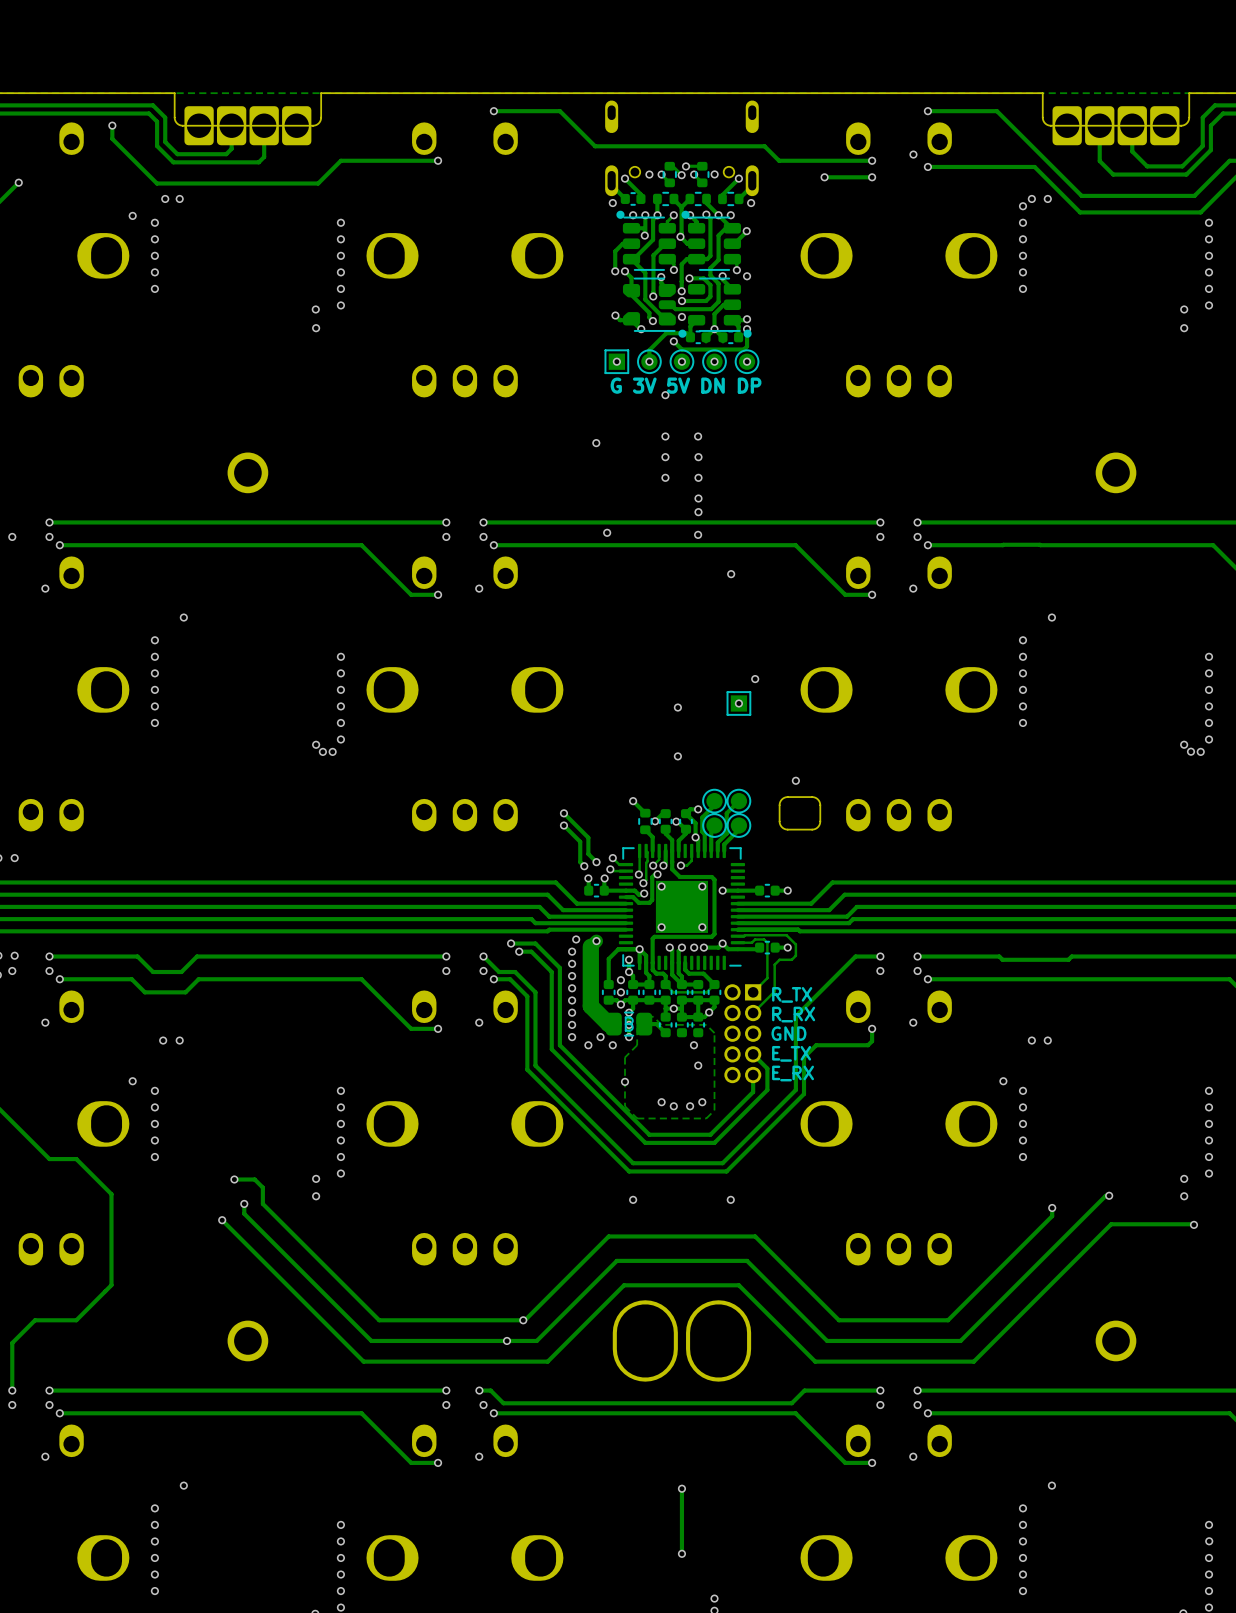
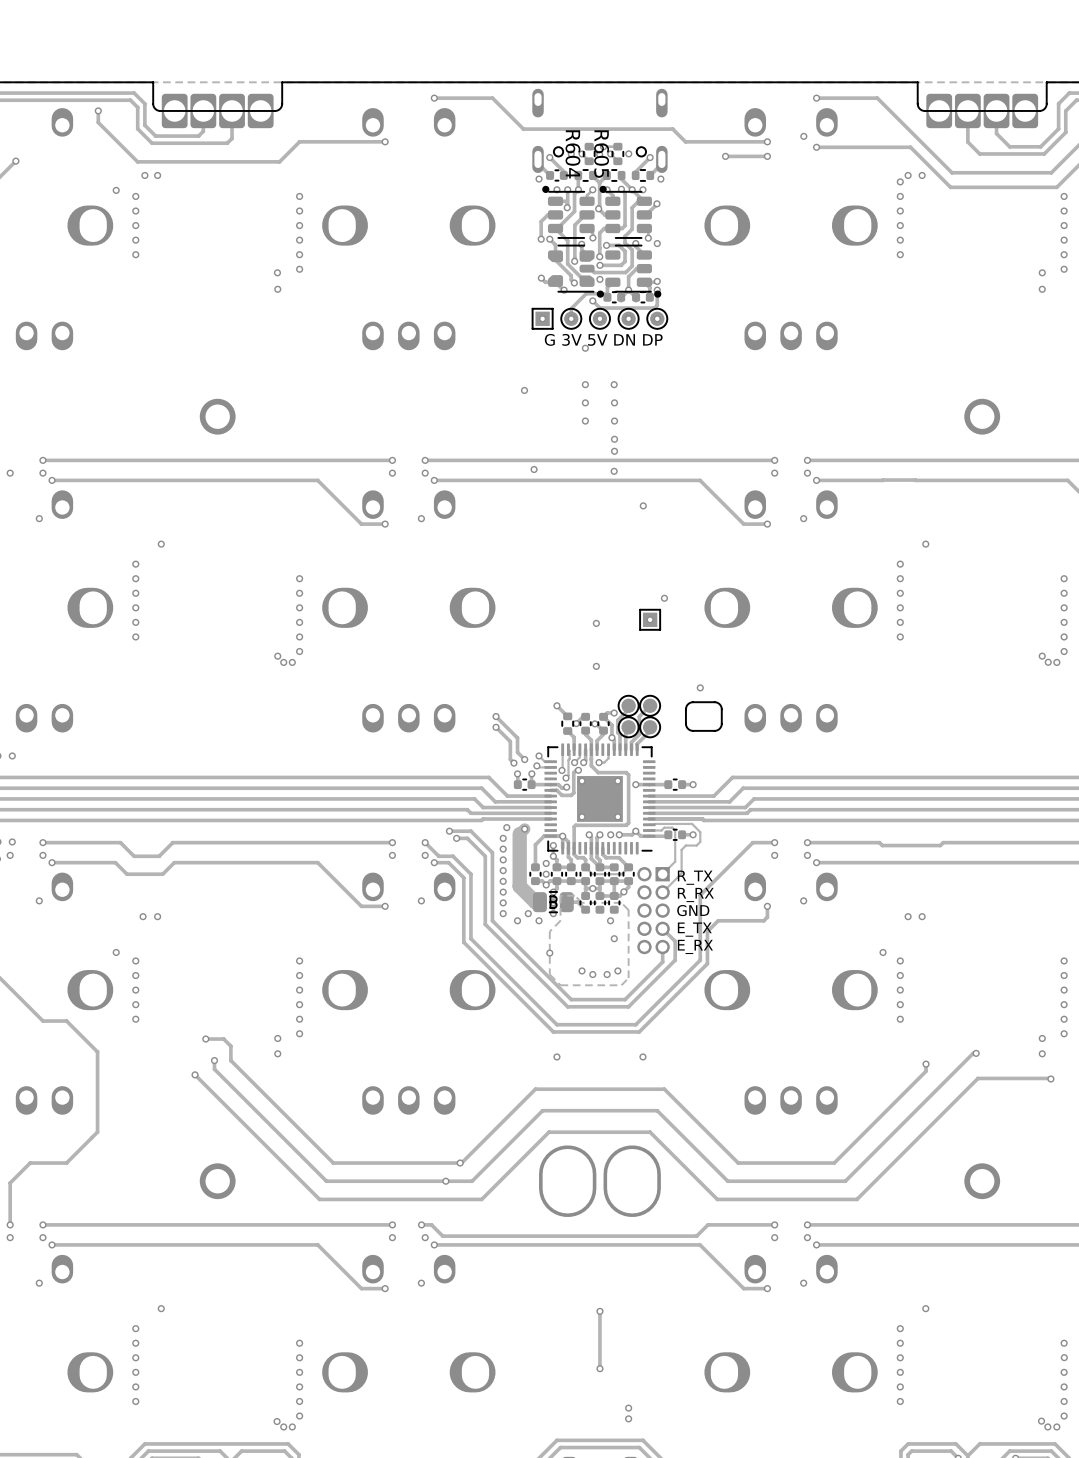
R605 name: none -> R605 (601, 154)
R604 name: none -> R604 (572, 154)

